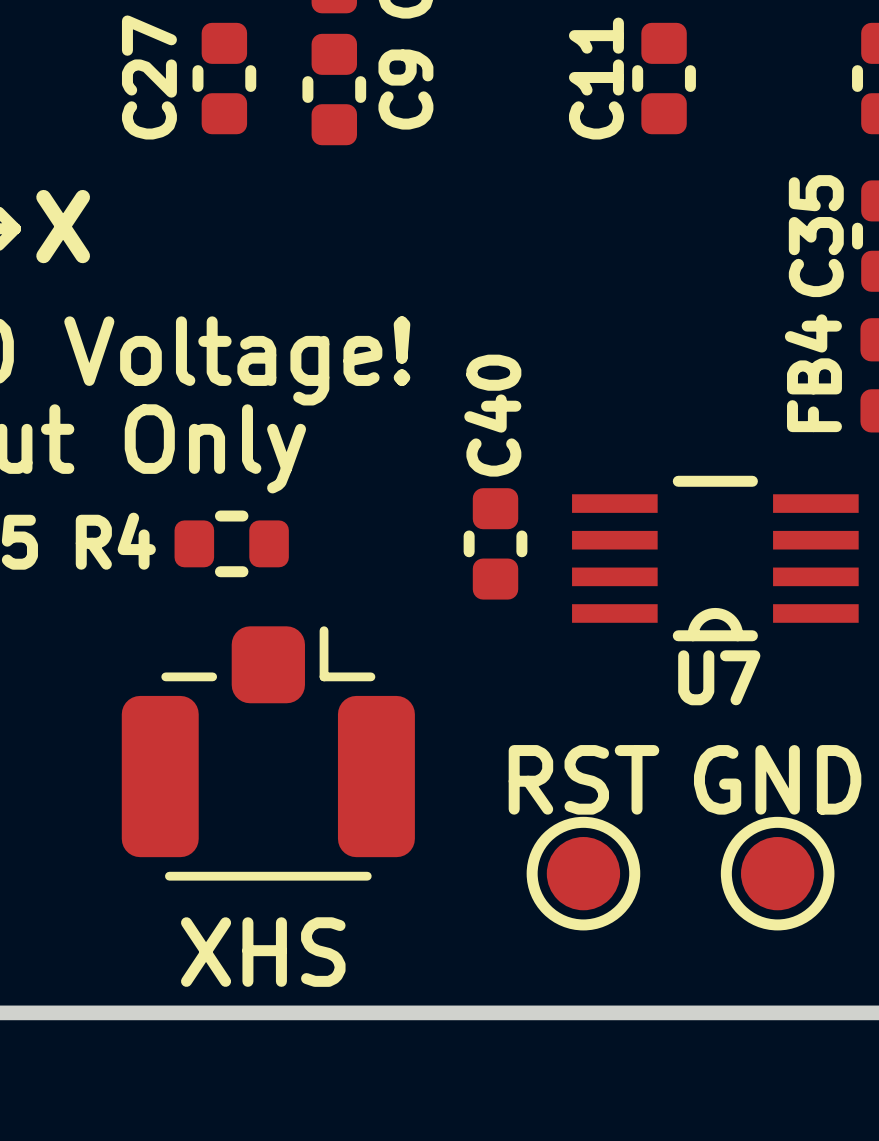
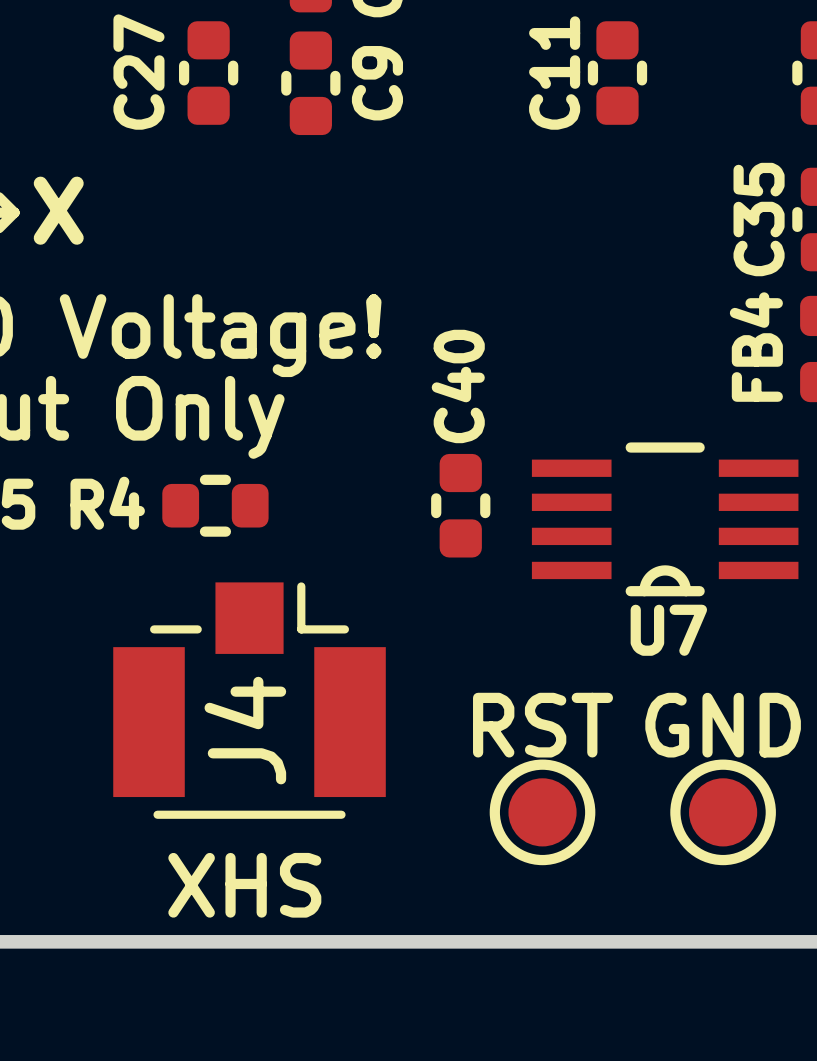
part: (268, 753) -> none
J4: none -> (249, 700)

